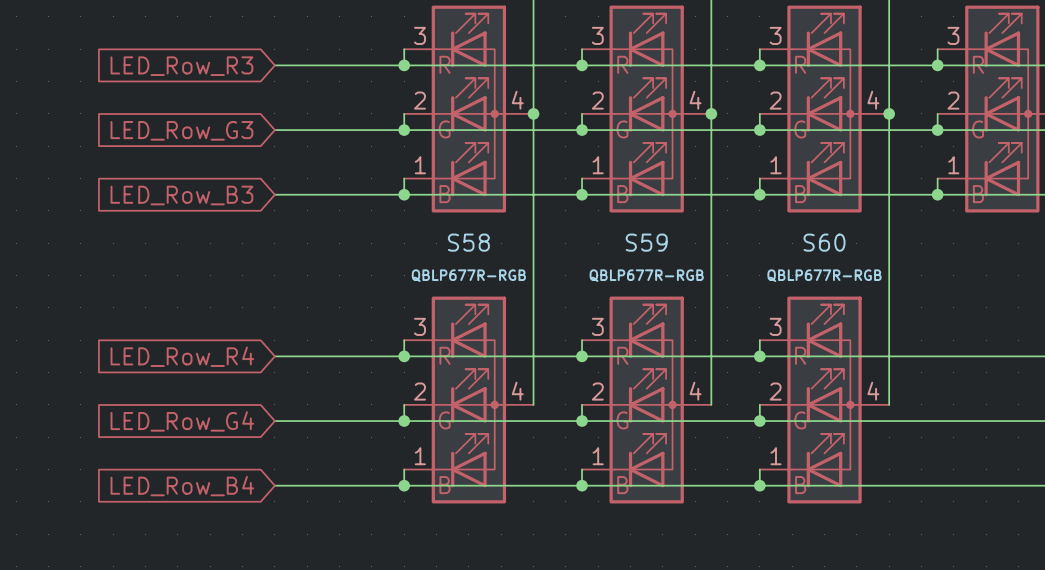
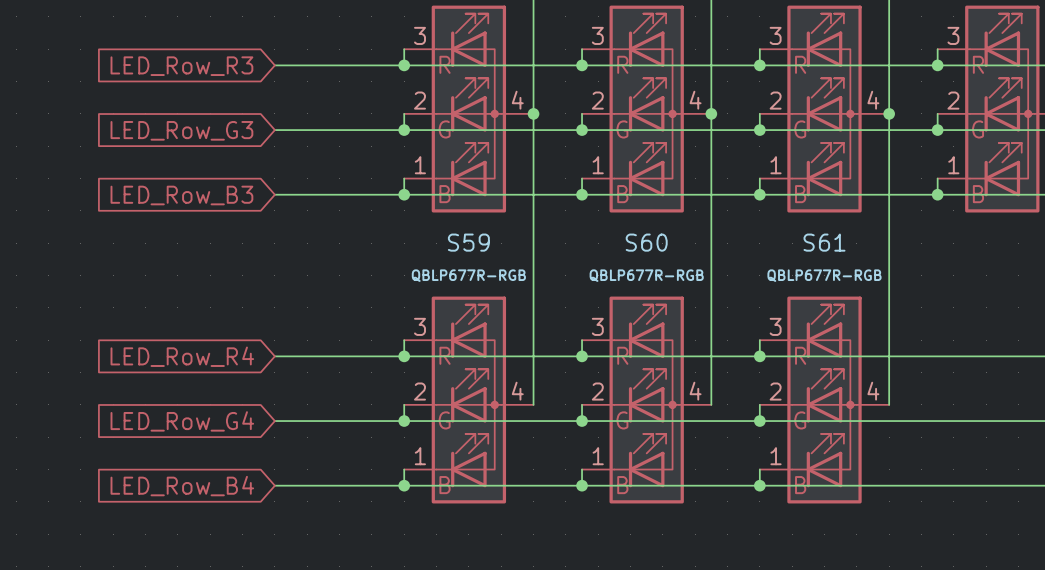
S58 name: S58 (468, 242) -> S59 (468, 242)
S59 name: S59 (646, 242) -> S60 (646, 242)
S60 name: S60 (824, 242) -> S61 (824, 242)

